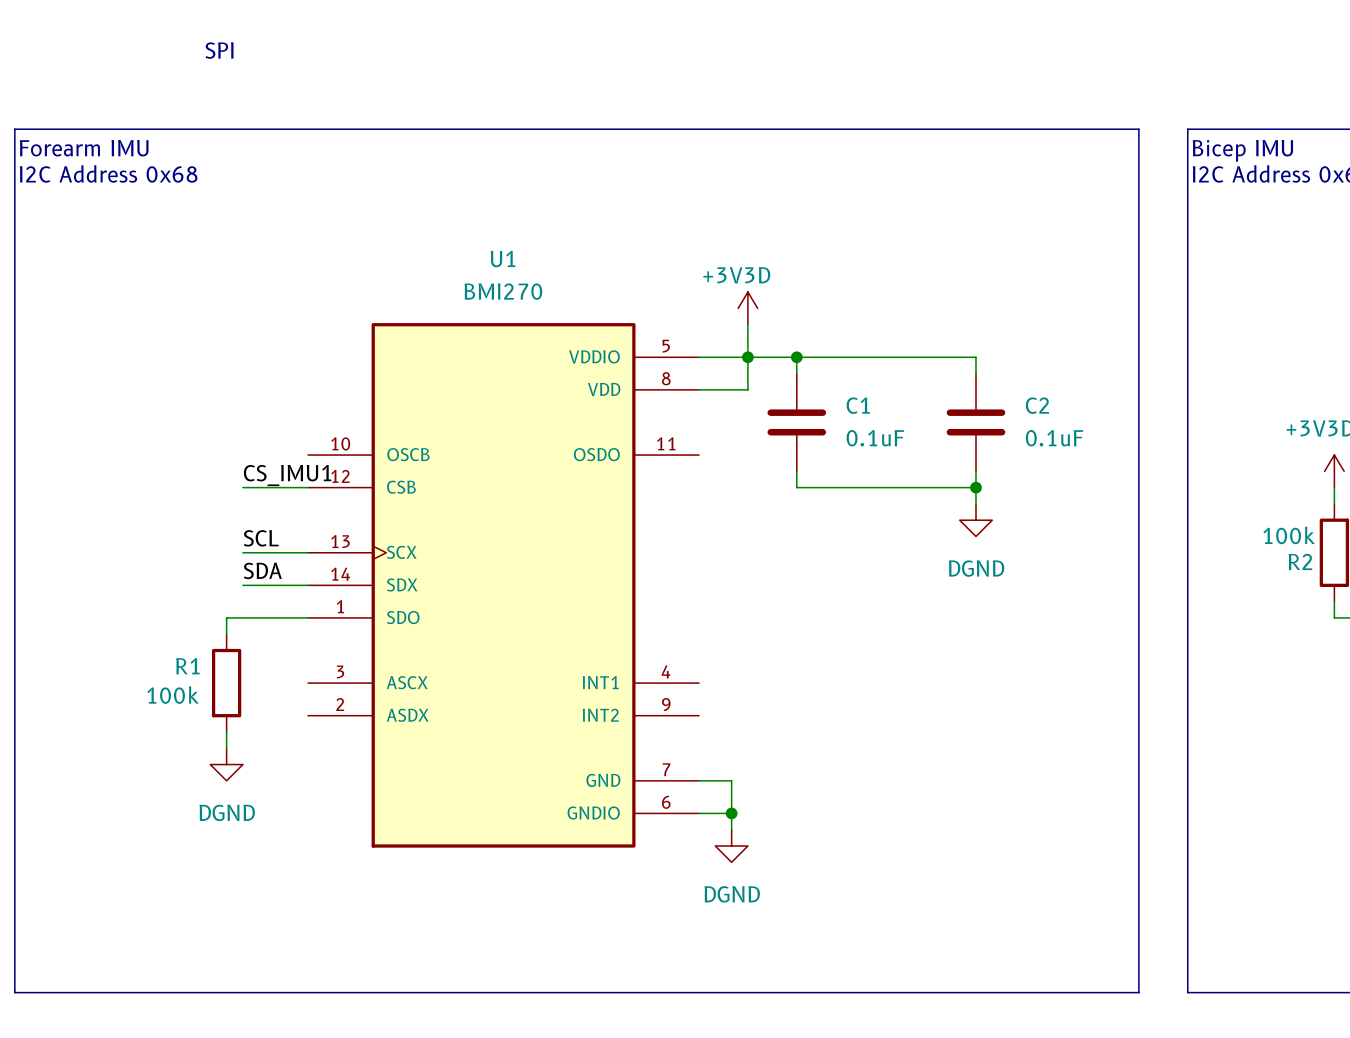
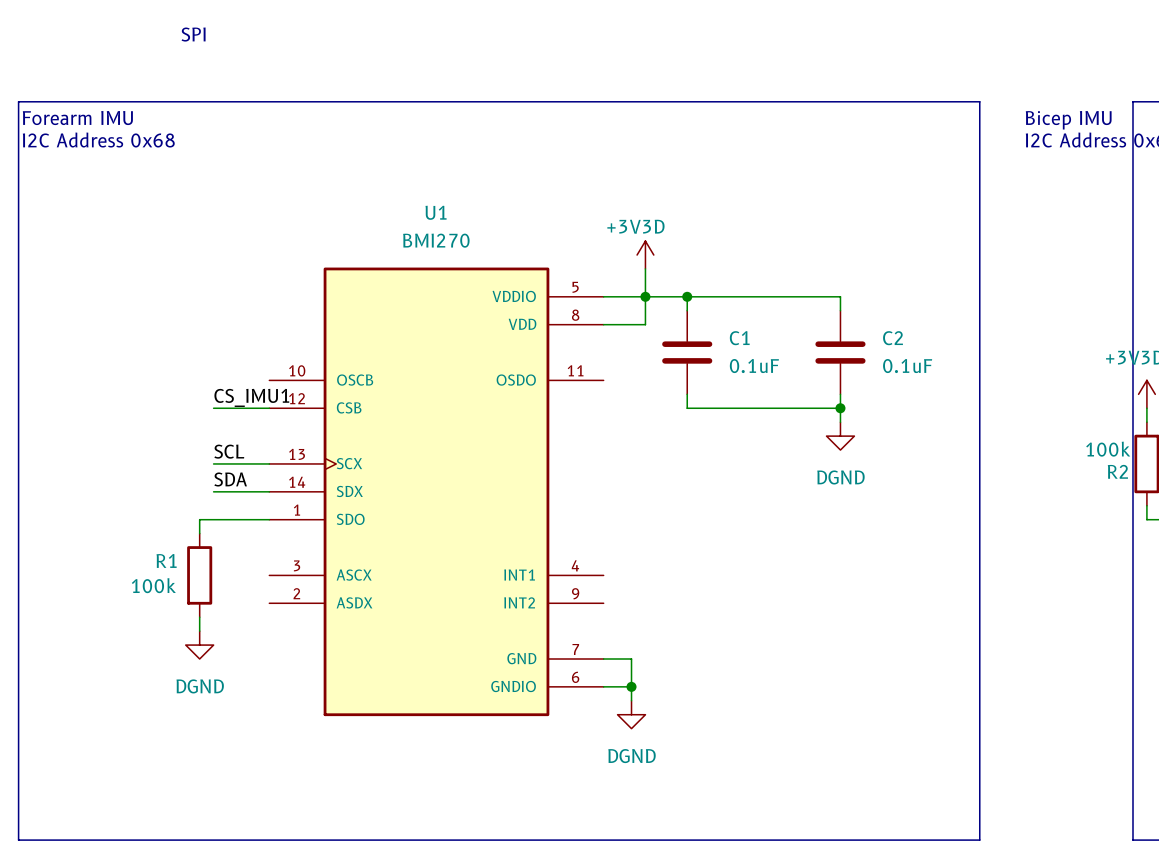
line: (1318, 129) (1187, 129) (1187, 992) (1318, 992) -> (1132, 101) (1132, 840)

